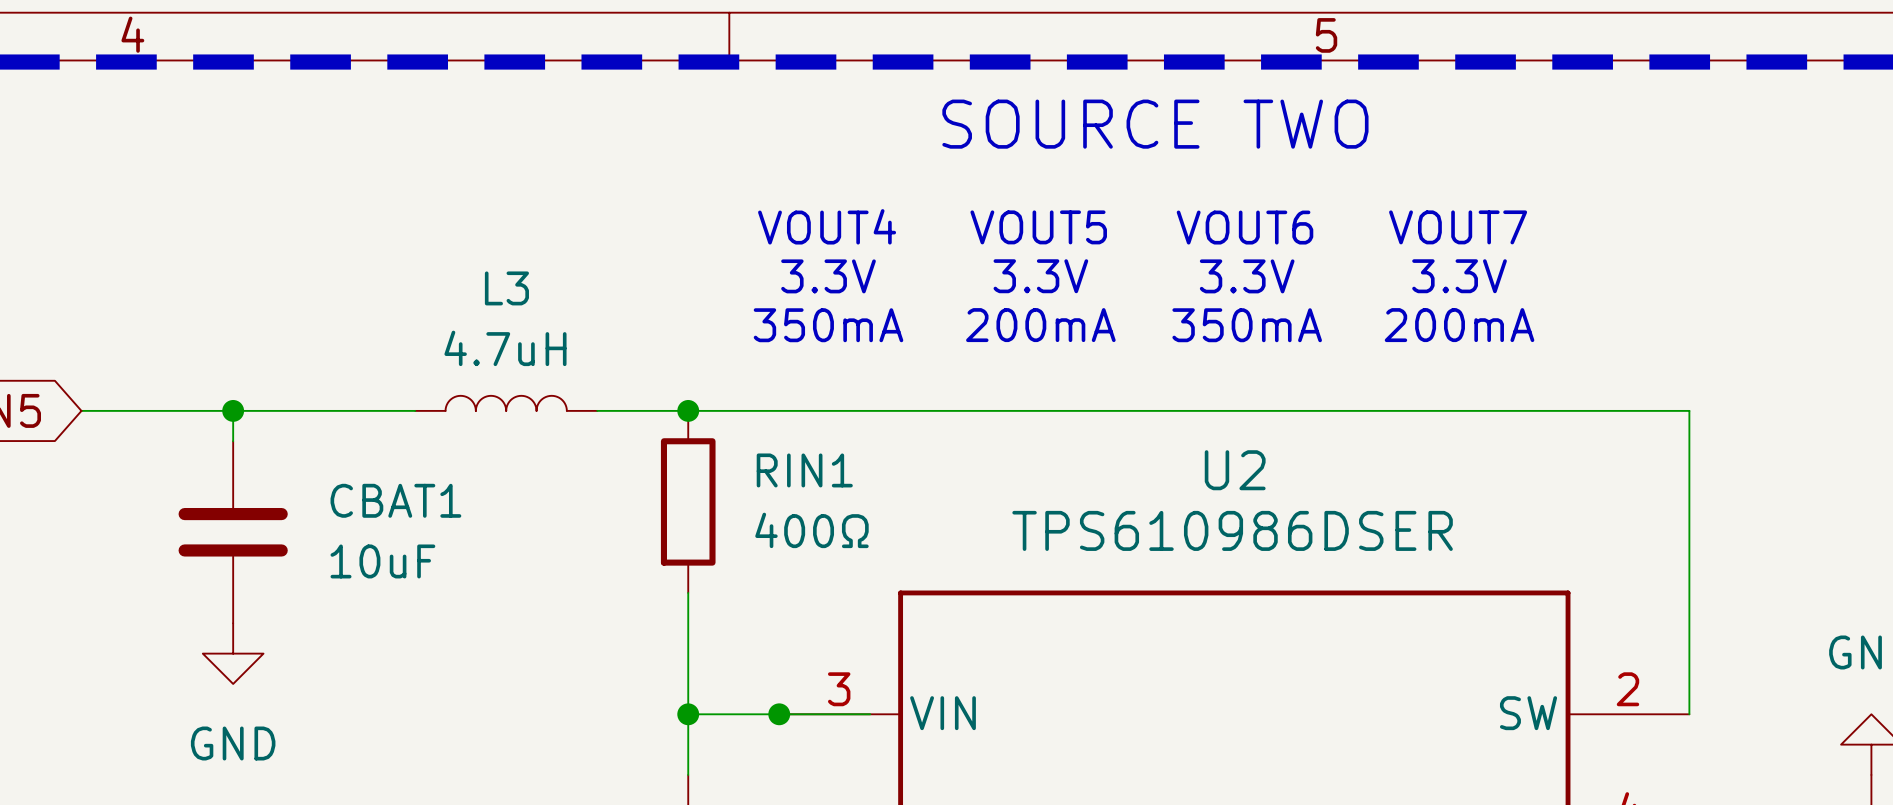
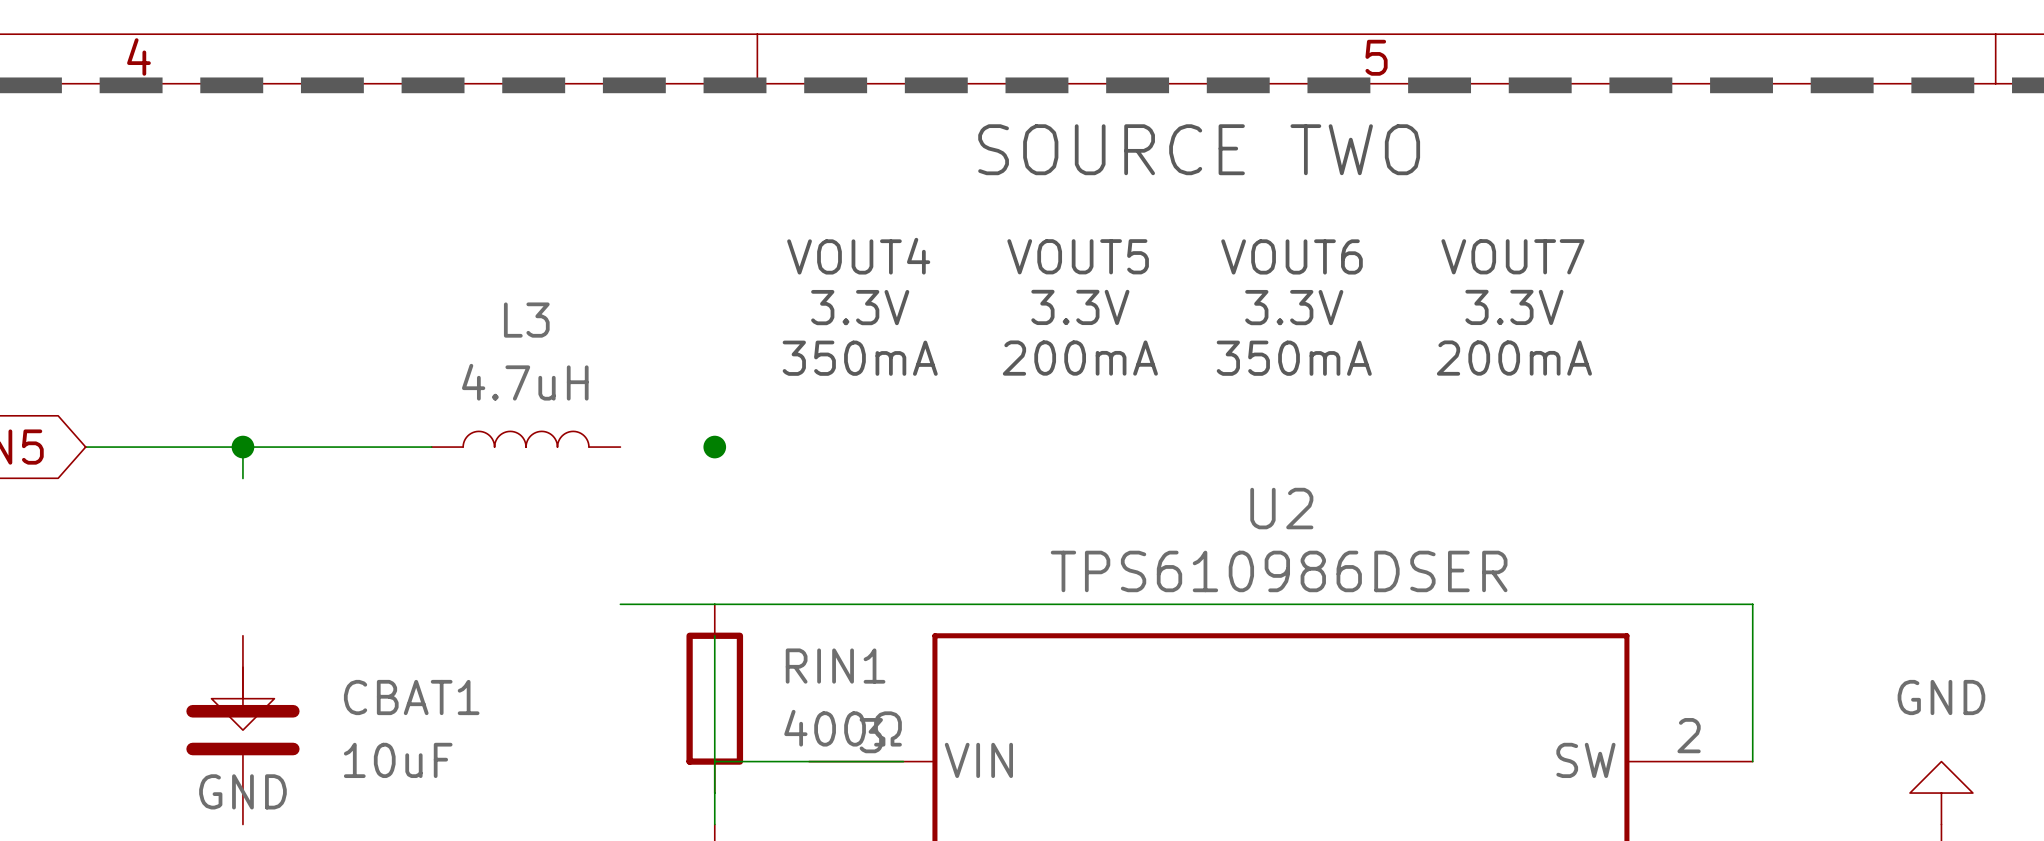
wire: (597, 410) (1689, 410) (1689, 562) -> (620, 604) (1752, 604)
RIN1 position: (688, 501) -> (714, 698)
CBAT1 position: (233, 532) -> (242, 730)
junction: (688, 714) -> none
junction: (779, 714) -> none

